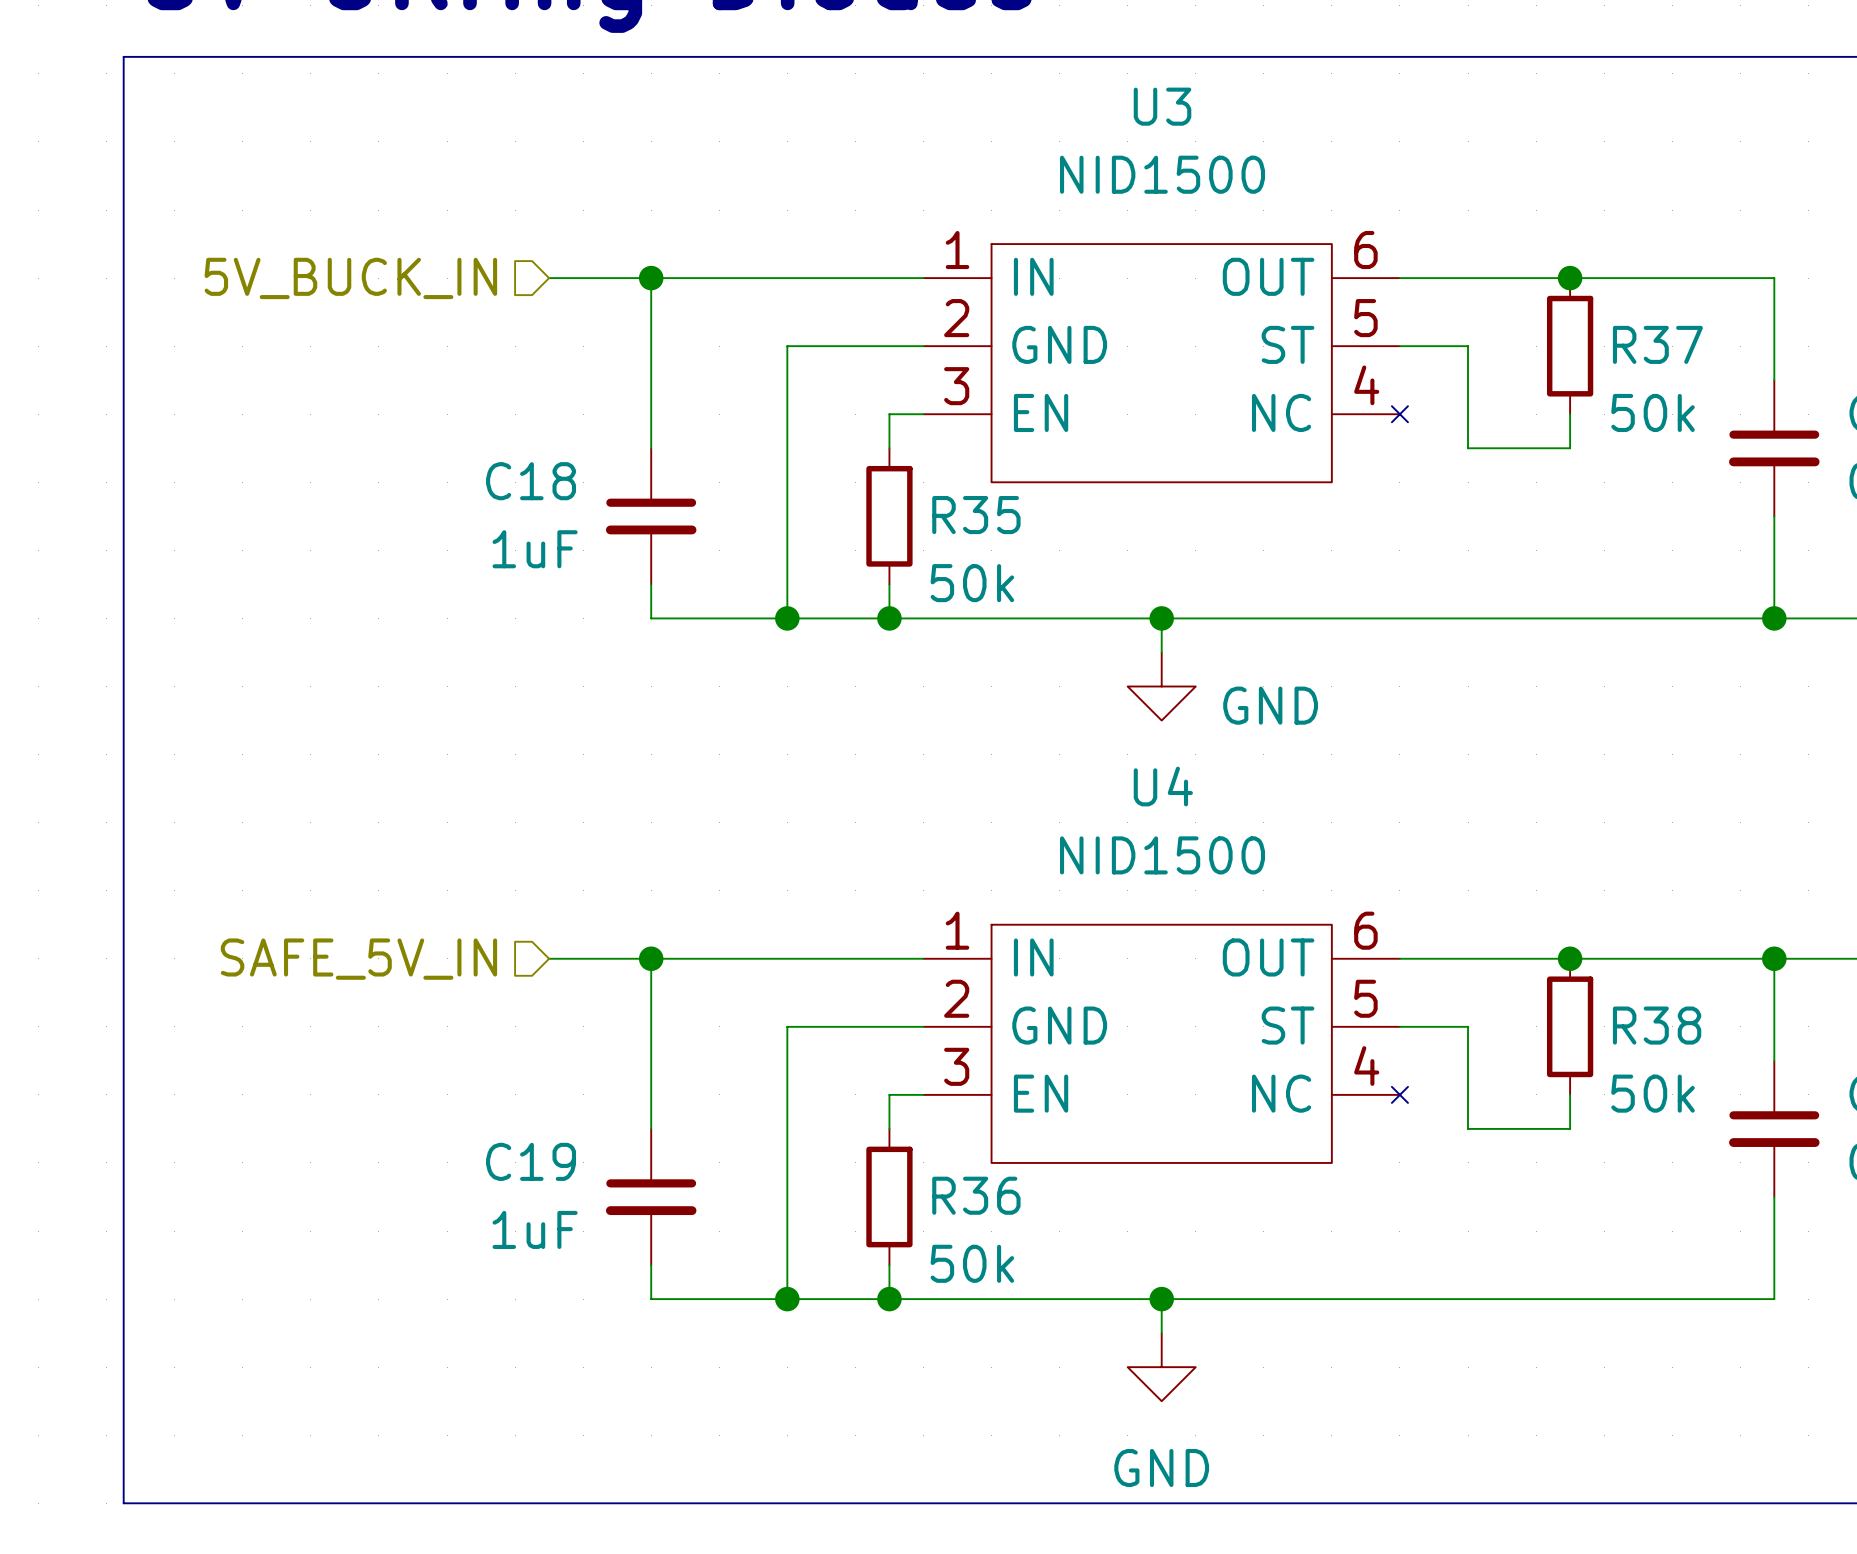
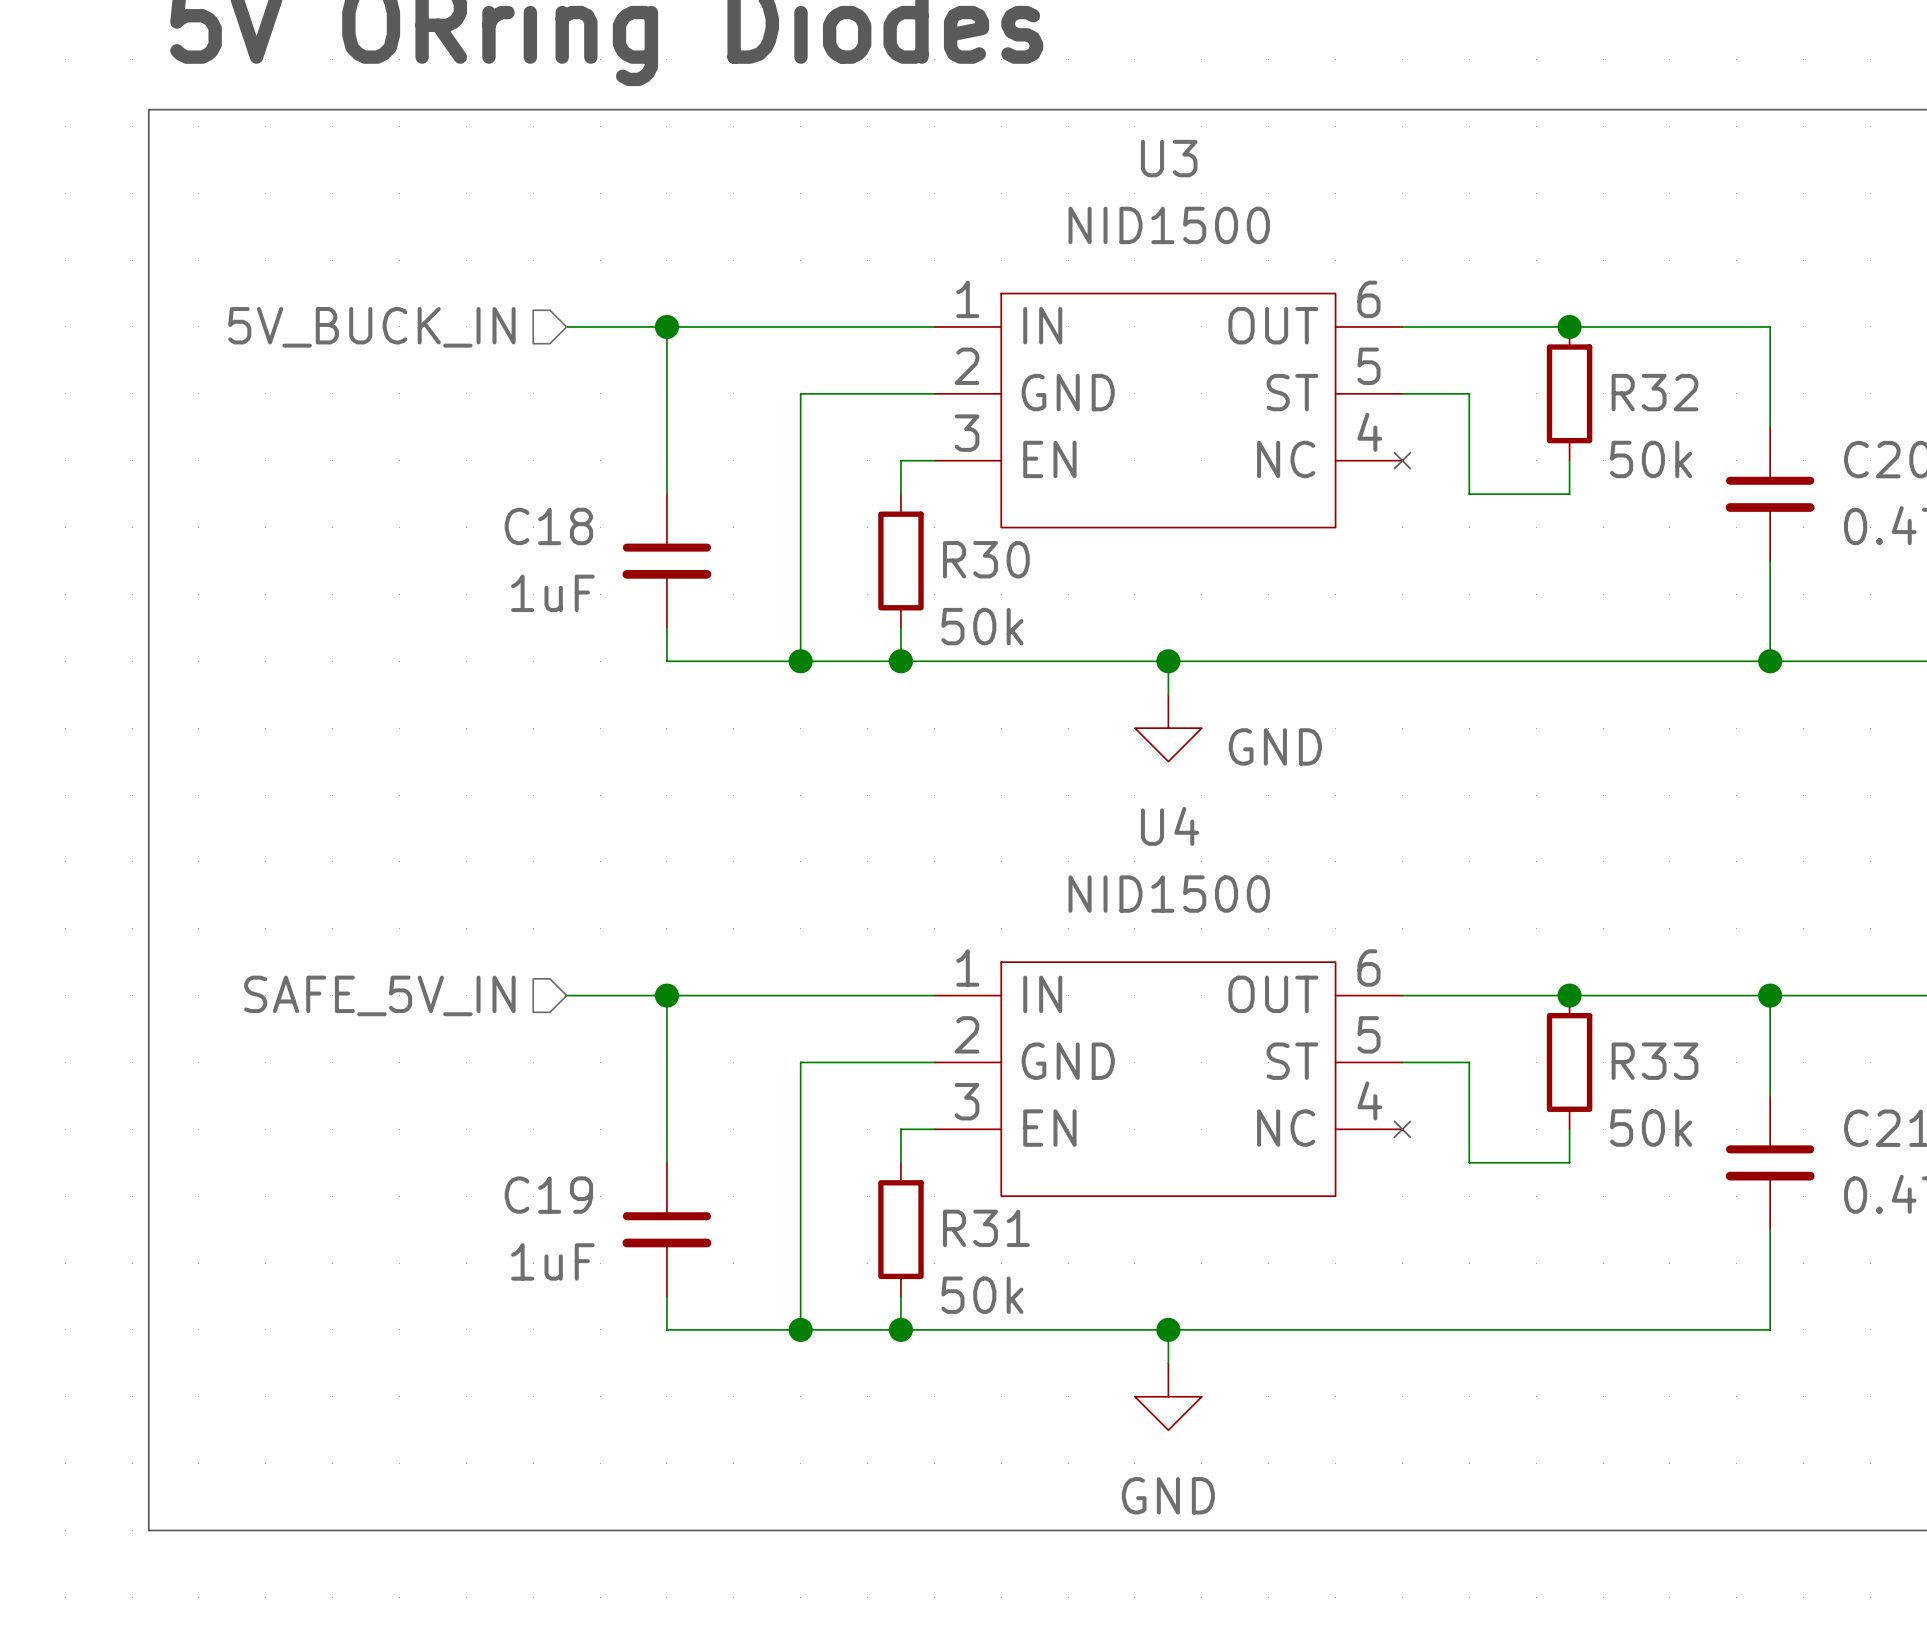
R37 name: R37 (1657, 344) -> R32 (1654, 392)
R35 name: R35 (976, 515) -> R30 (986, 559)
R38 name: R38 (1657, 1025) -> R33 (1654, 1061)
R36 name: R36 (976, 1195) -> R31 (986, 1228)

